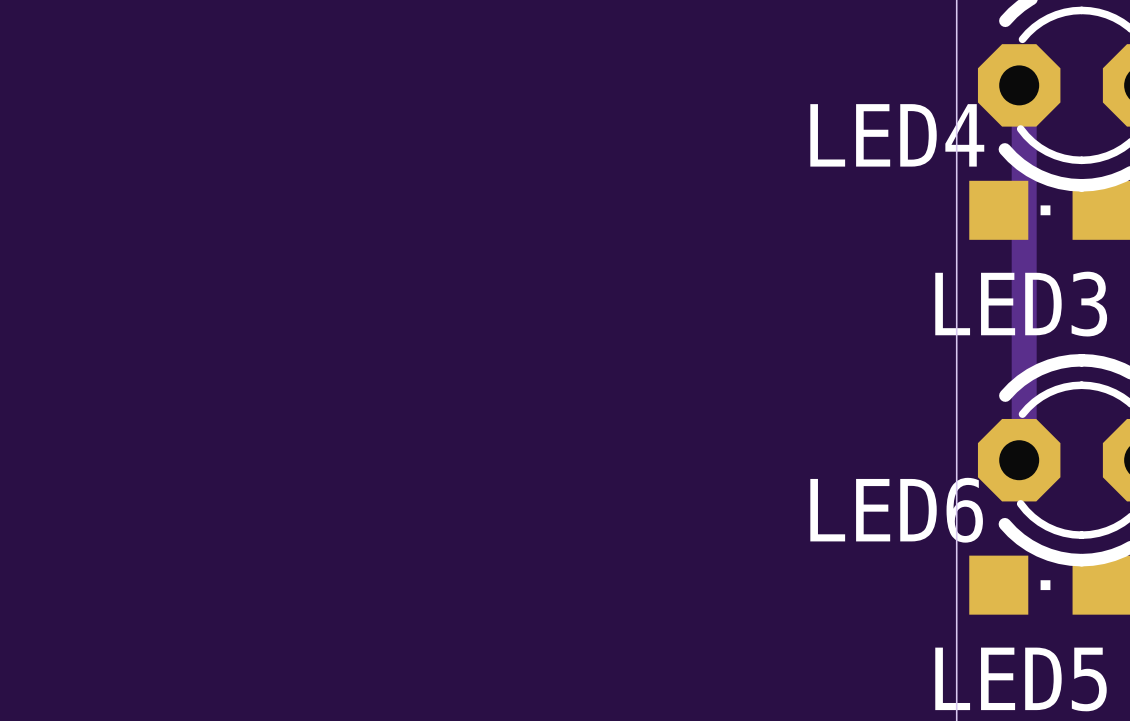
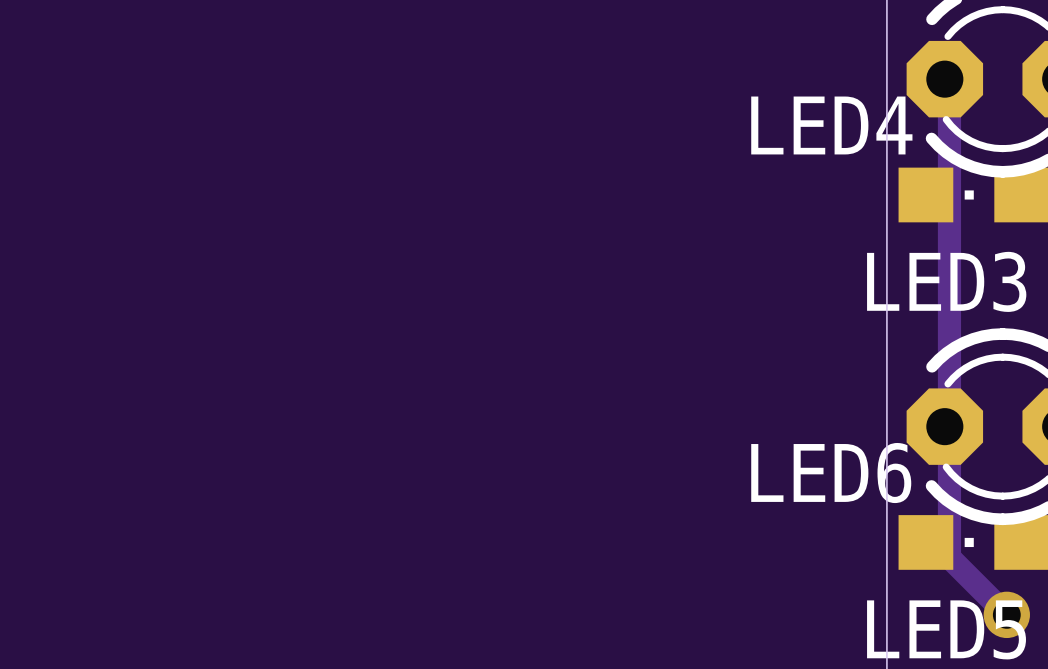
track: none -> (944, 426) (949, 437) (949, 557) (1006, 614)
via: none -> (1006, 614)

